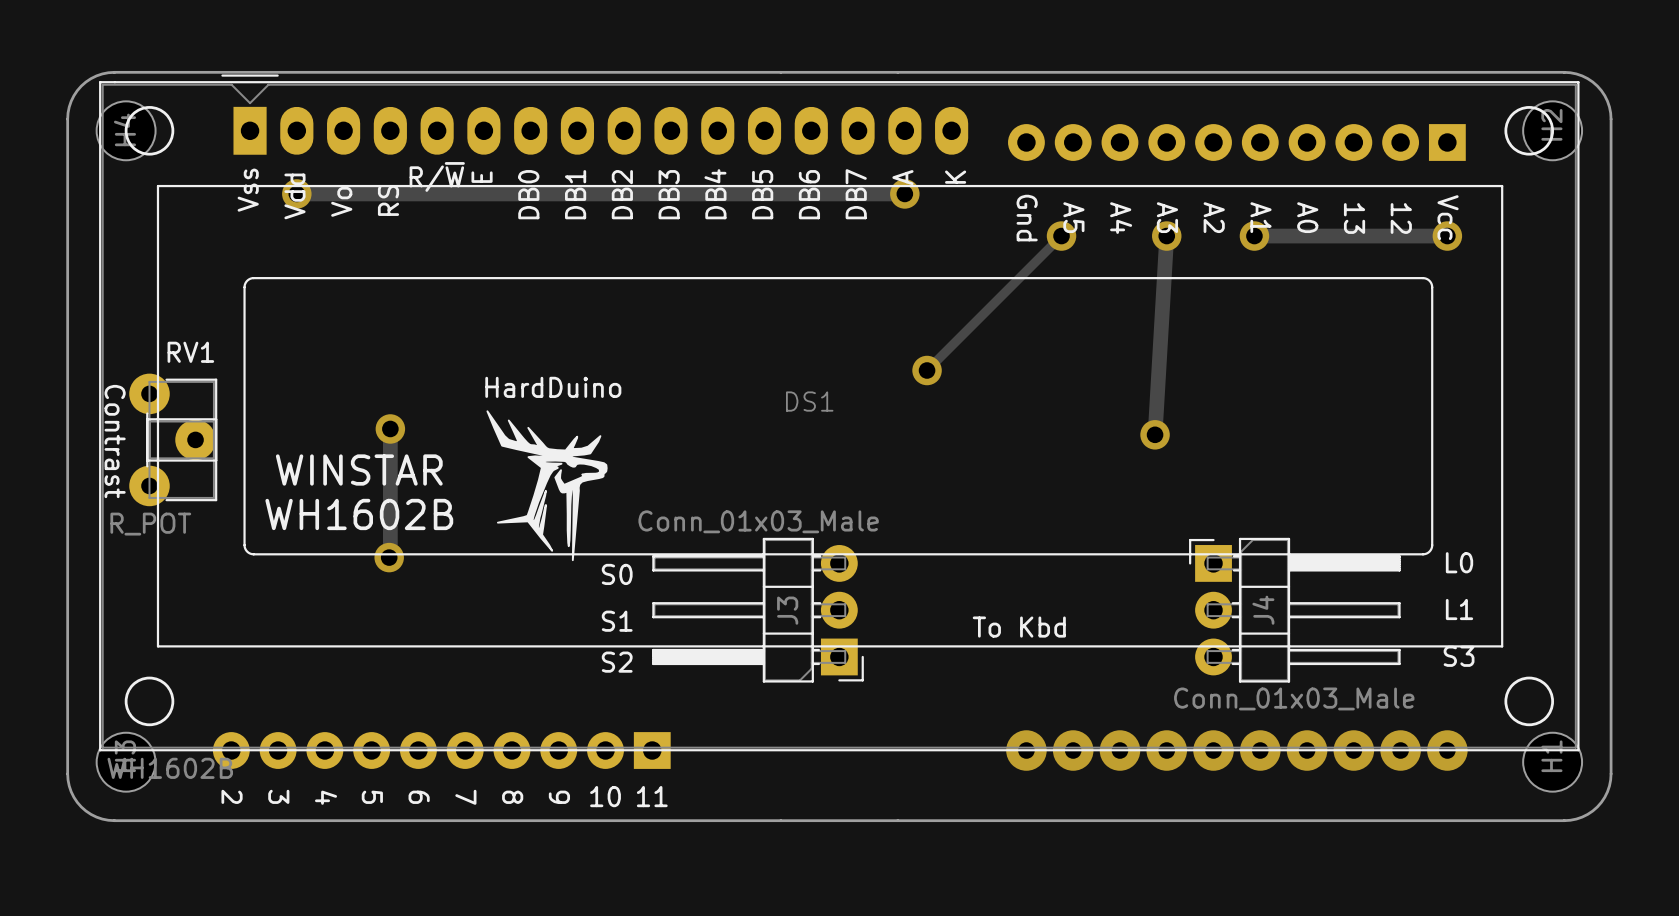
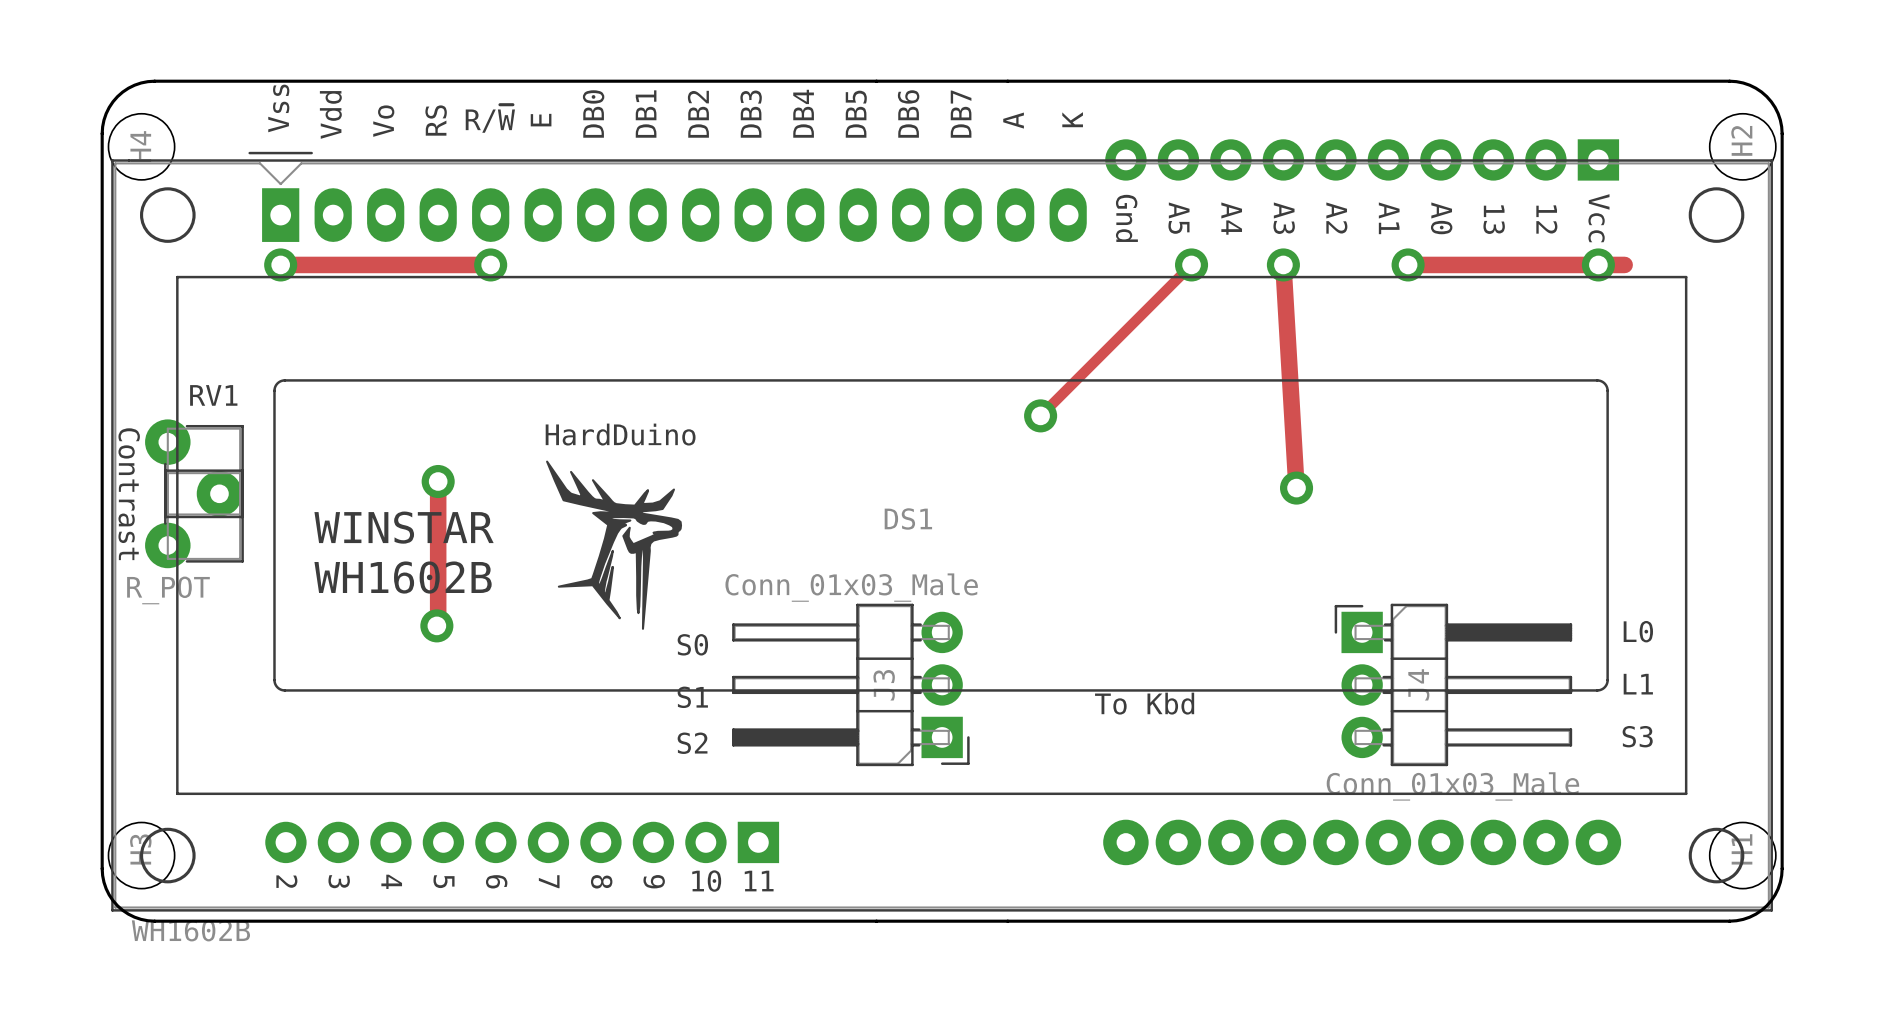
board edge: (137, 72) (108, 72) (91, 78) (81, 86) (73, 95) (69, 107) (67, 119) (68, 780) (71, 791) (77, 802) (91, 814) (108, 820) (137, 820) -> (154, 81) (134, 85) (117, 96) (106, 113) (102, 133) (102, 875) (106, 888) (117, 905) (134, 917) (154, 921)
board edge: (1540, 72) (1570, 72) (1587, 78) (1597, 86) (1604, 95) (1609, 107) (1611, 119) (1610, 780) (1607, 791) (1601, 802) (1587, 814) (1570, 820) (1540, 820) -> (1729, 81) (1749, 85) (1766, 96) (1778, 113) (1782, 133) (1781, 875) (1778, 888) (1766, 905) (1749, 917) (1729, 921)
part position: (1236, 142) -> (1362, 159)
text position: R/~{W} (437, 176) -> R/~{W} (490, 118)
text position: E (482, 177) -> E (541, 120)
text position: A (902, 177) -> A (1013, 120)
text position: K (955, 177) -> K (1072, 119)
text position: Vss (248, 190) -> Vss (278, 108)
track: (296, 193) (904, 193) -> none
via position: (296, 193) -> (280, 264)
via: (904, 193) -> none
text position: DB0 (528, 194) -> DB0 (593, 113)
text position: DB1 (575, 194) -> DB1 (646, 114)
text position: DB2 (622, 194) -> DB2 (698, 114)
text position: DB3 (669, 194) -> DB3 (751, 114)
text position: DB4 (715, 194) -> DB4 (803, 113)
text position: DB5 (762, 194) -> DB5 (856, 114)
text position: DB6 (809, 194) -> DB6 (908, 113)
text position: DB7 (856, 194) -> DB7 (961, 114)
text position: Vdd (294, 196) -> Vdd (330, 114)
text position: RS (388, 200) -> RS (436, 120)
text position: Vo (341, 201) -> Vo (383, 121)
text position: A5 (1073, 217) -> A5 (1178, 218)
text position: A3 (1167, 217) -> A3 (1284, 218)
text position: A2 (1214, 217) -> A2 (1336, 218)
text position: A1 (1260, 217) -> A1 (1389, 218)
text position: A0 (1307, 217) -> A0 (1441, 218)
text position: Vcc (1448, 217) -> Vcc (1598, 218)
text position: Gnd (1027, 218) -> Gnd (1126, 218)
text position: A4 (1121, 218) -> A4 (1231, 218)
text position: 13 (1354, 218) -> 13 (1494, 219)
text position: 12 (1401, 218) -> 12 (1546, 219)
track: none -> (280, 264) (490, 264)
via: none -> (490, 264)
track: (1166, 236) (1155, 434) -> (1283, 264) (1296, 488)
via position: (1166, 236) -> (1283, 264)
via position: (1447, 236) -> (1598, 264)
DS1 position: (839, 412) -> (942, 531)
part position: (441, 750) -> (522, 842)
via: none -> (1125, 842)
via: (1026, 750) -> none
via: none -> (1178, 842)
via: (1073, 750) -> none
via: none -> (1230, 842)
via: (1119, 750) -> none
via: none -> (1283, 842)
via: (1166, 750) -> none
via: none -> (1335, 842)
via: (1213, 750) -> none
via: none -> (1388, 842)
via: (1260, 750) -> none
via: none -> (1440, 842)
via: (1307, 750) -> none
via: none -> (1493, 842)
via: (1353, 750) -> none
via: none -> (1545, 842)
via: (1400, 750) -> none
via: none -> (1598, 842)
via: (1447, 750) -> none
text position: 2 (232, 796) -> 2 (286, 881)
text position: 3 (278, 796) -> 3 (339, 881)
text position: 10 (605, 796) -> 10 (706, 881)
text position: 11 (652, 796) -> 11 (759, 881)
text position: 4 (326, 797) -> 4 (391, 881)
text position: 5 (372, 797) -> 5 (444, 881)
text position: 6 (419, 797) -> 6 (496, 881)
text position: 7 (465, 797) -> 7 (549, 881)
text position: 8 (512, 797) -> 8 (601, 881)
text position: 9 (559, 797) -> 9 (654, 881)

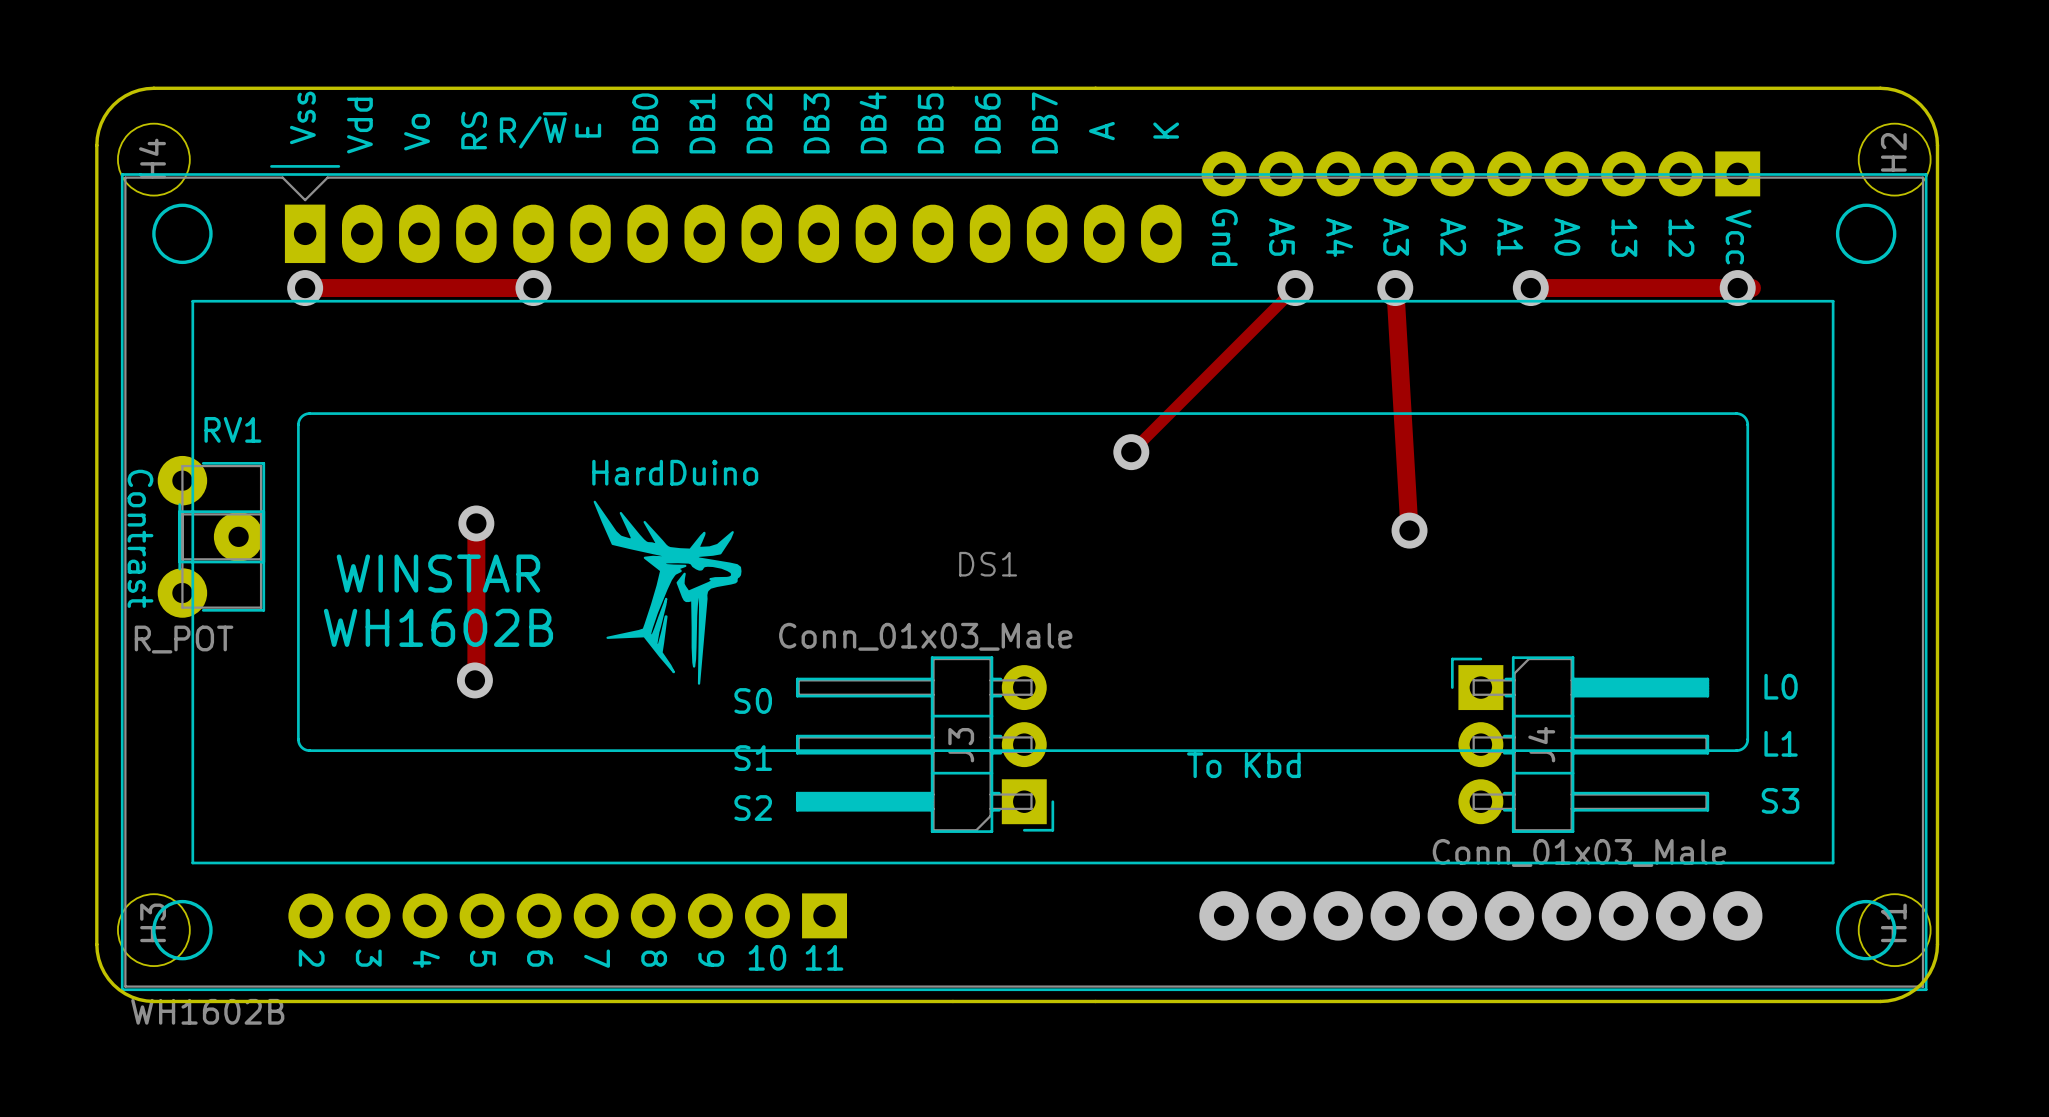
board edge: (154, 81) (134, 85) (117, 96) (106, 113) (102, 133) (102, 875) (106, 888) (117, 905) (134, 917) (154, 921) -> (96, 145) (97, 951) (104, 972) (119, 989) (139, 999) (168, 1001)
board edge: none -> (168, 88) (139, 90) (119, 100) (104, 116) (98, 130) (96, 145)
track: (1611, 264) (1624, 264) -> none

